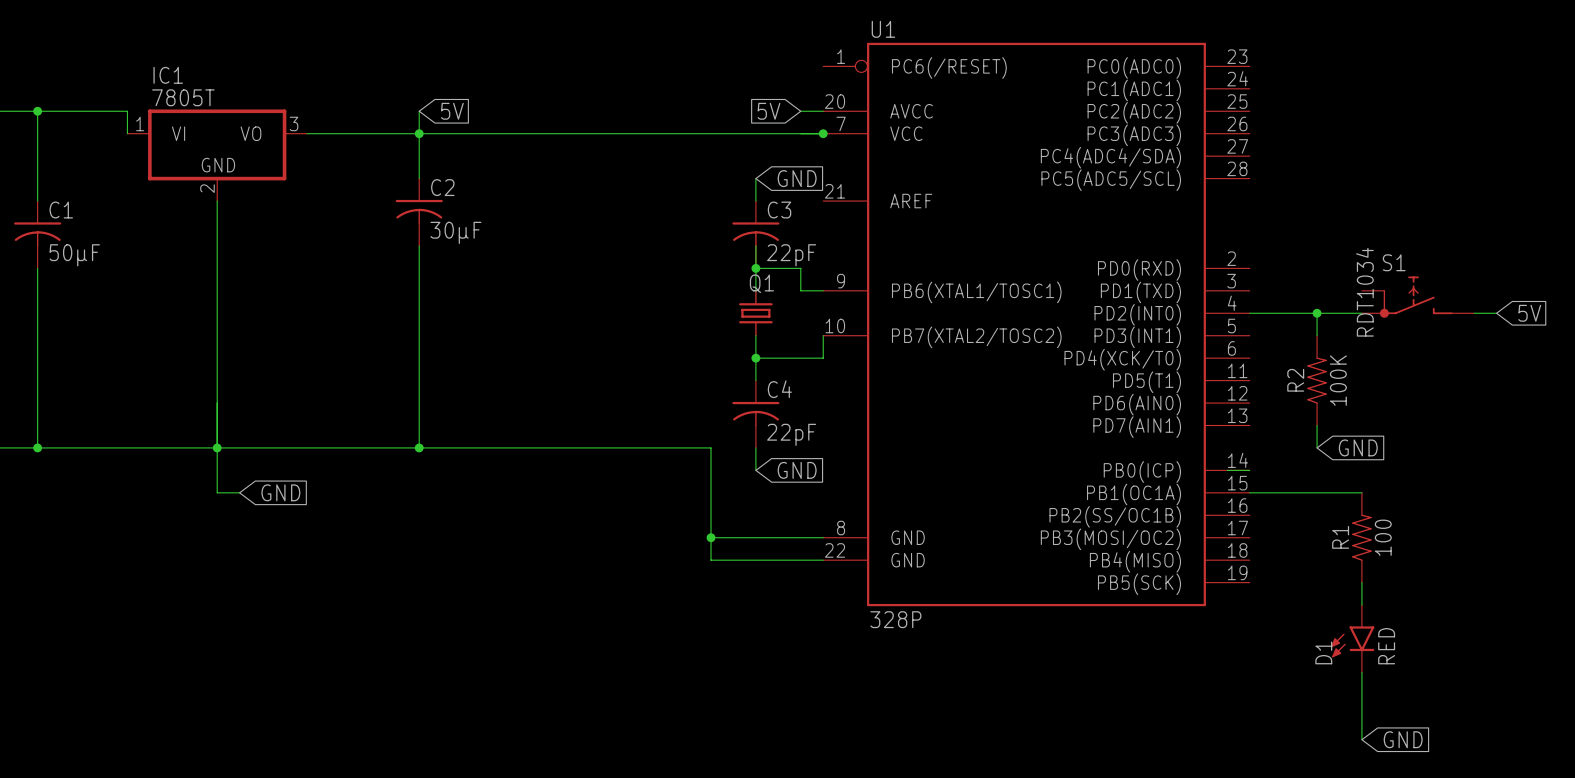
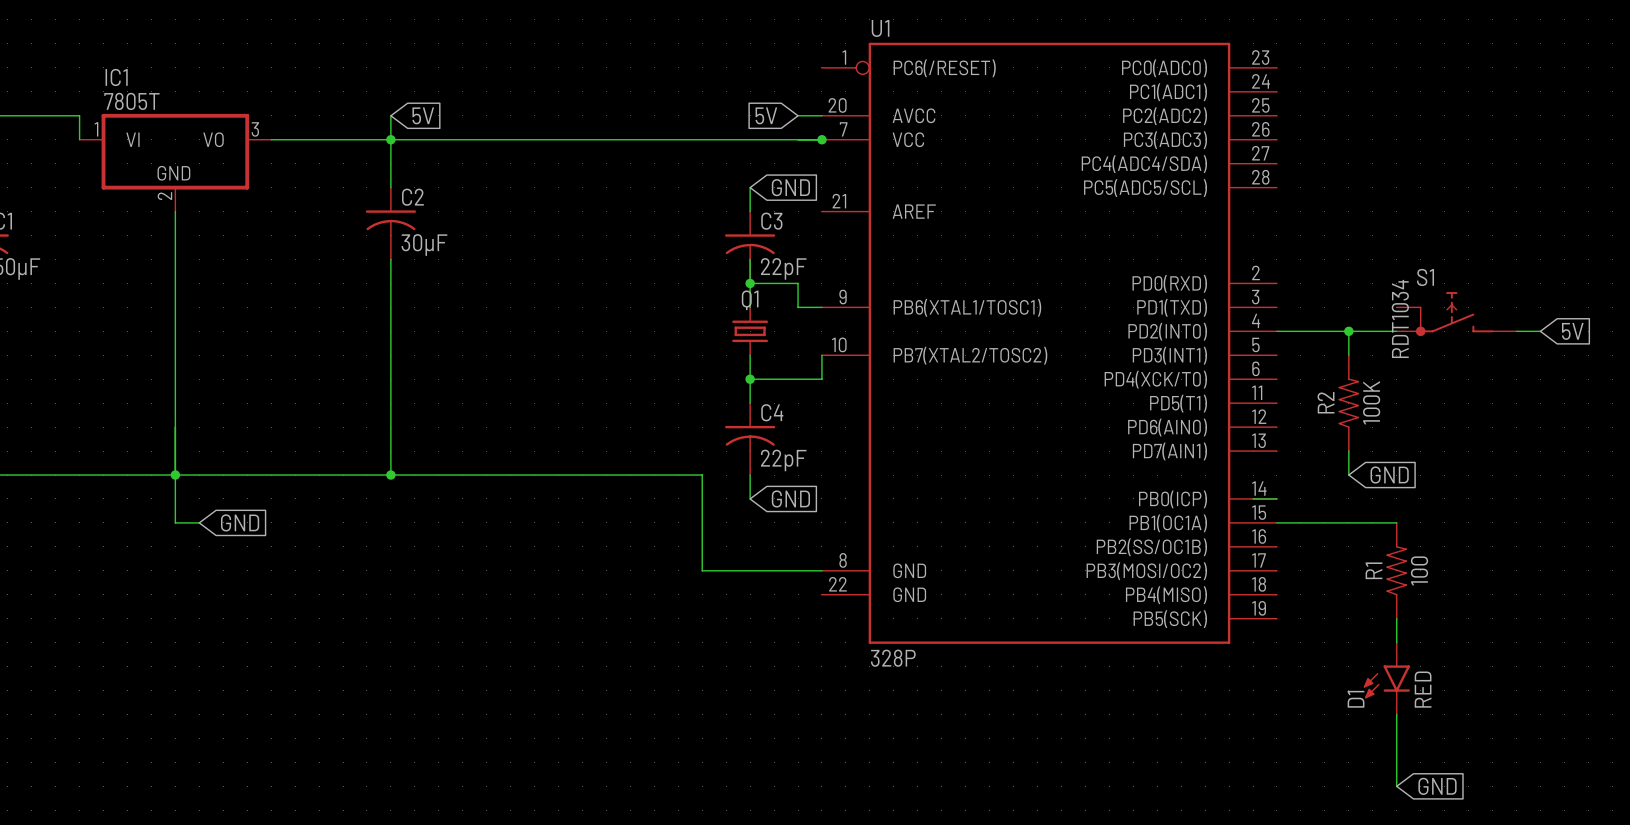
wire: (711, 537) (711, 560) (823, 560) -> none
junction: (711, 537) -> none

